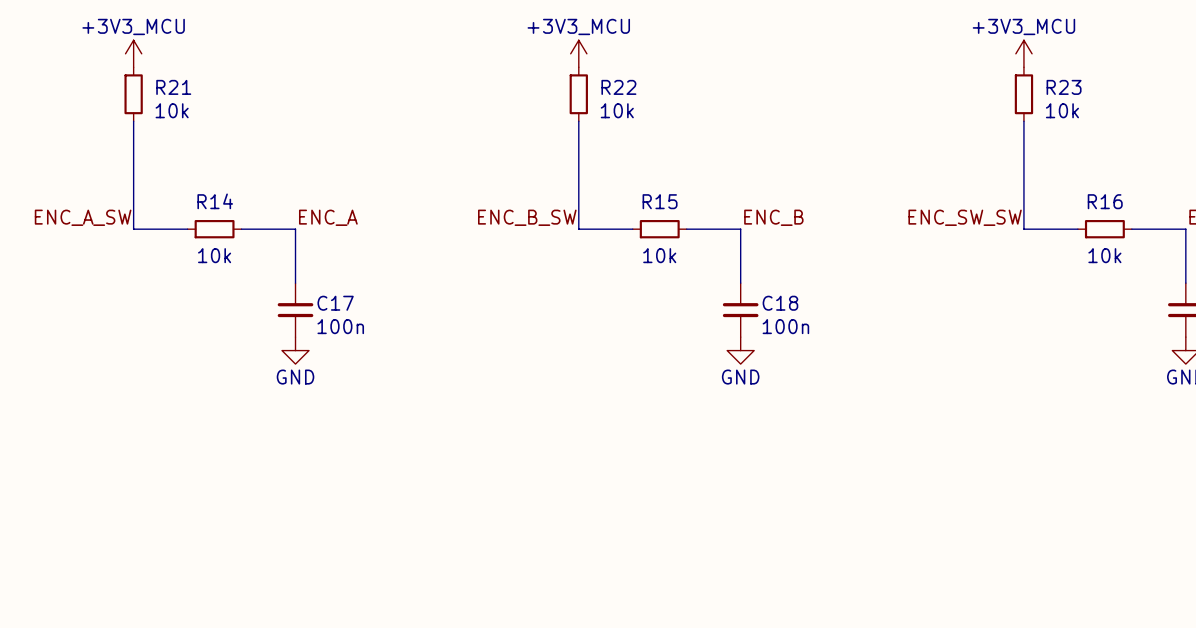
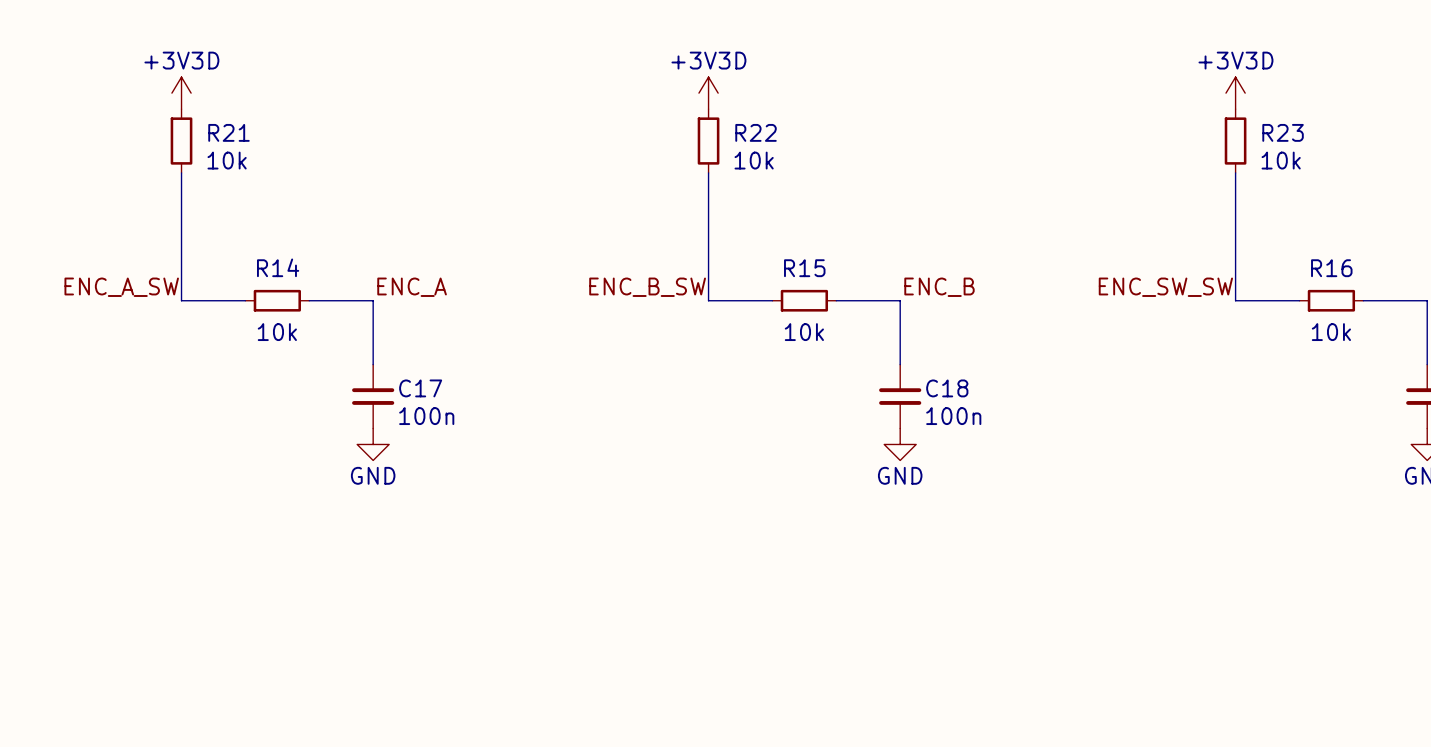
power symbol: +3V3_MCU (133, 53) -> +3V3D (181, 93)
power symbol: +3V3_MCU (578, 53) -> +3V3D (708, 93)
power symbol: +3V3_MCU (1023, 53) -> +3V3D (1235, 93)

